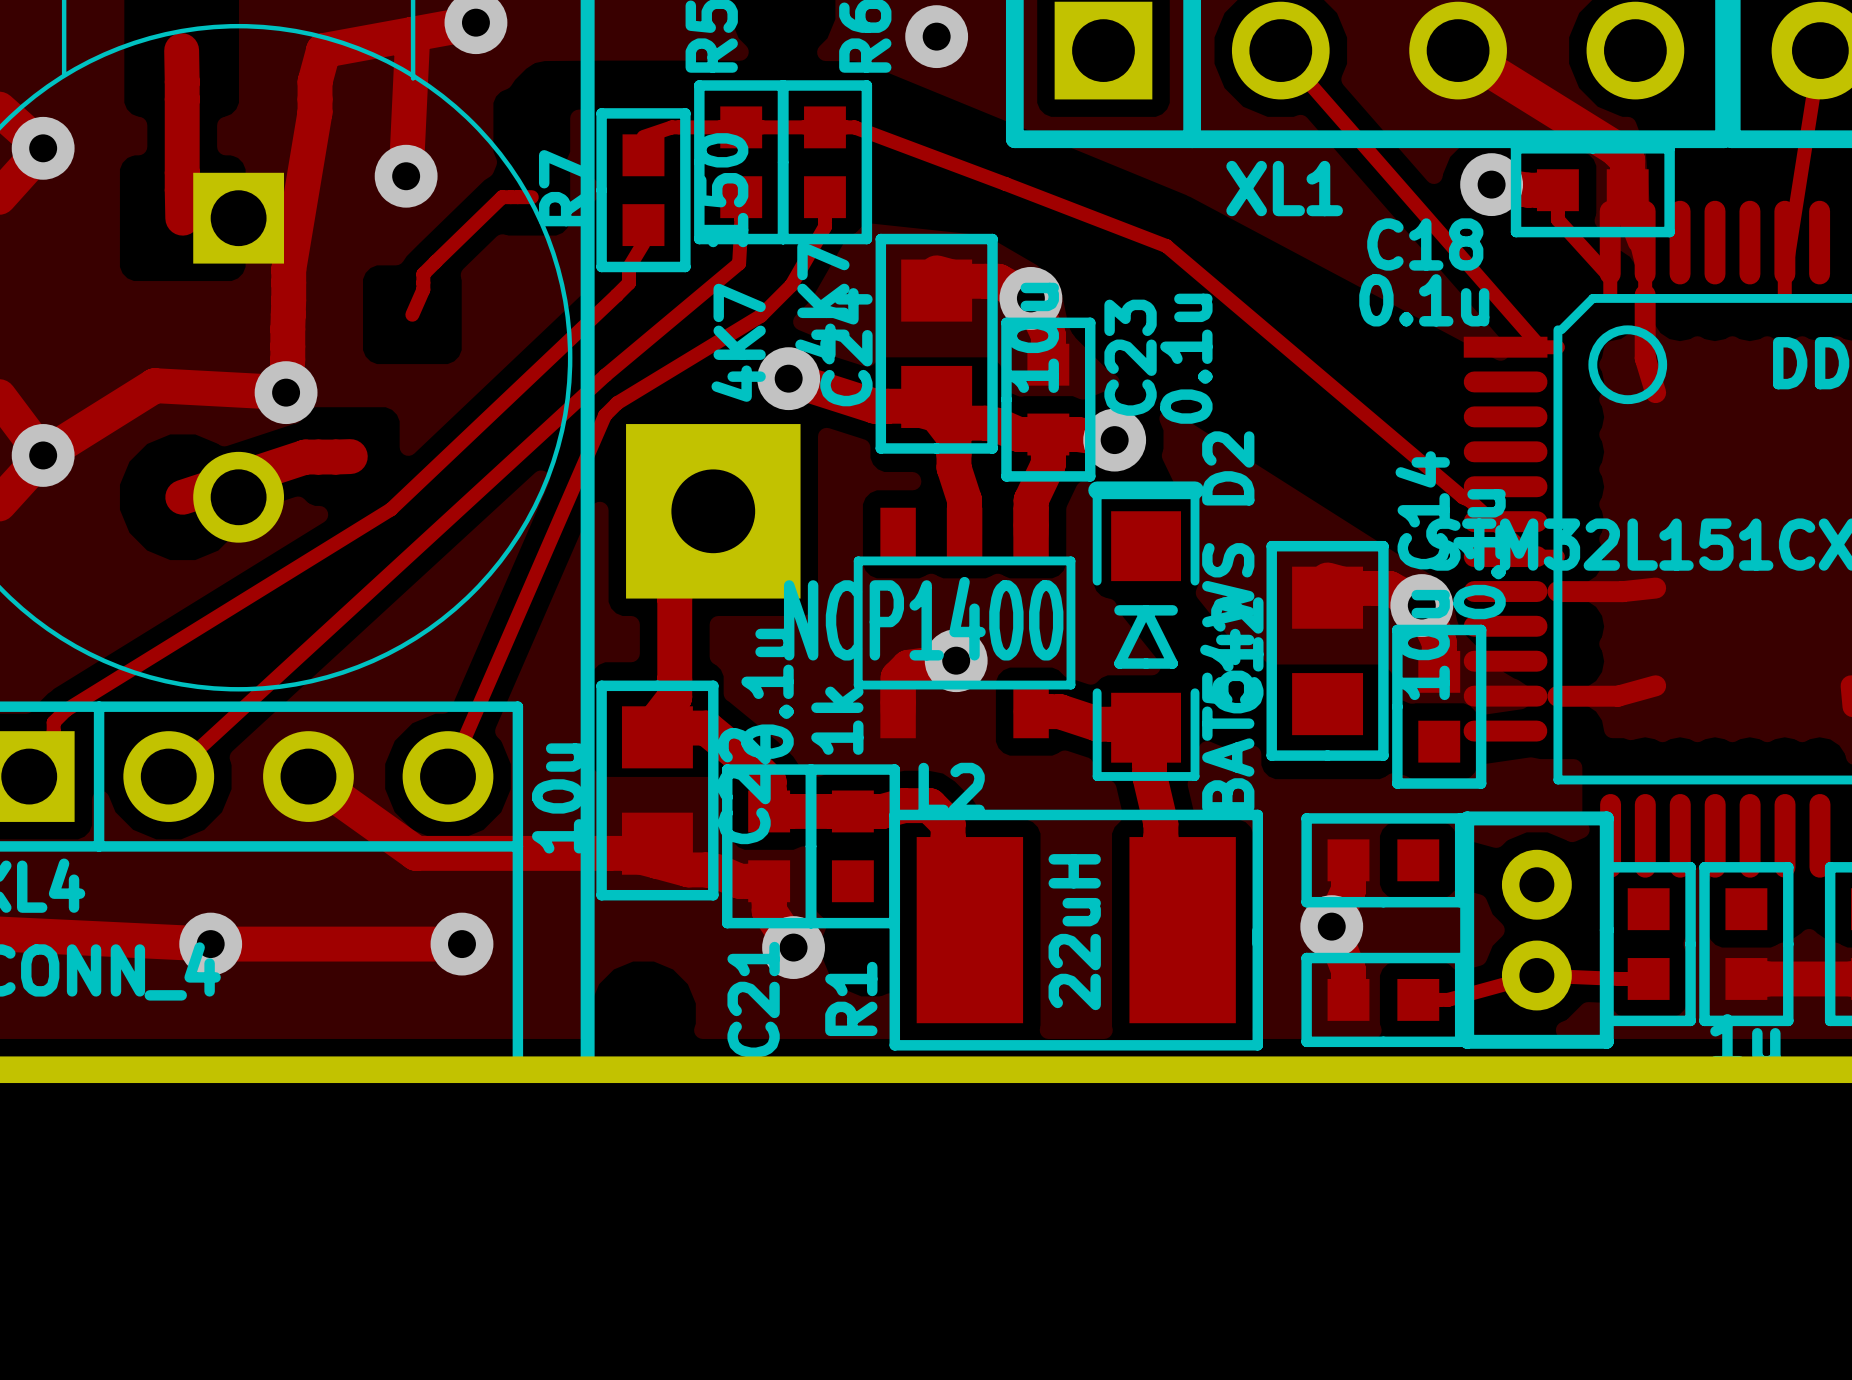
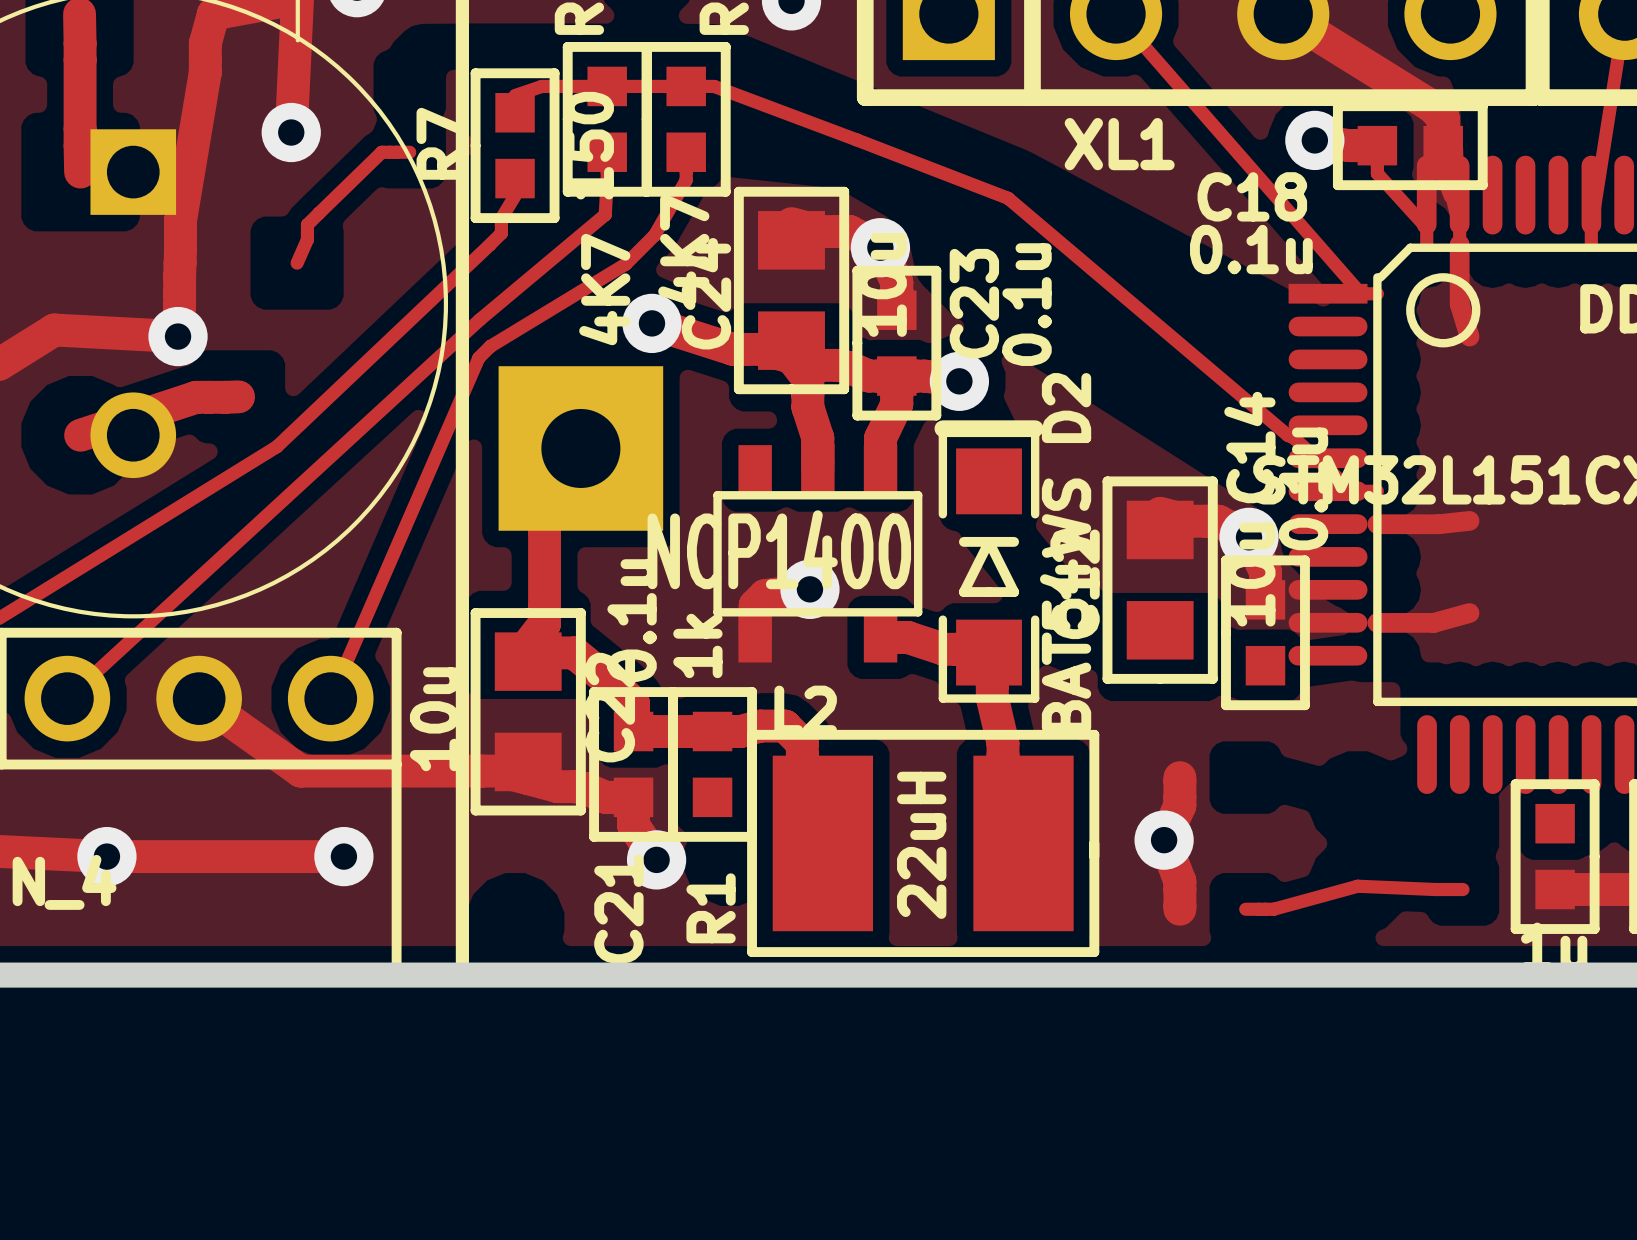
part: (1383, 860) -> none
part: (1536, 930) -> none
part: (1648, 944) -> none
part: (1383, 999) -> none

